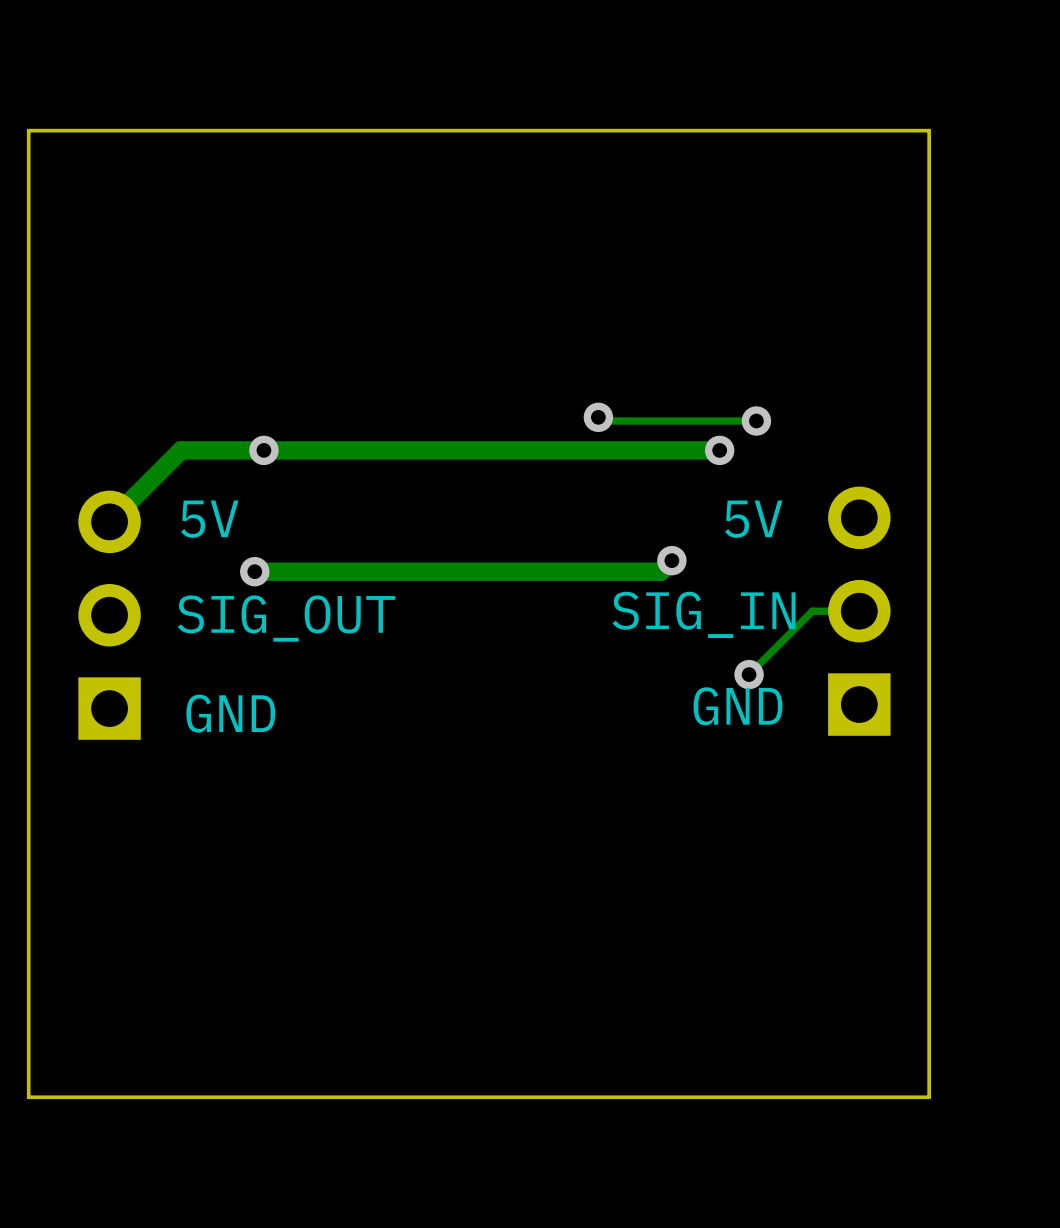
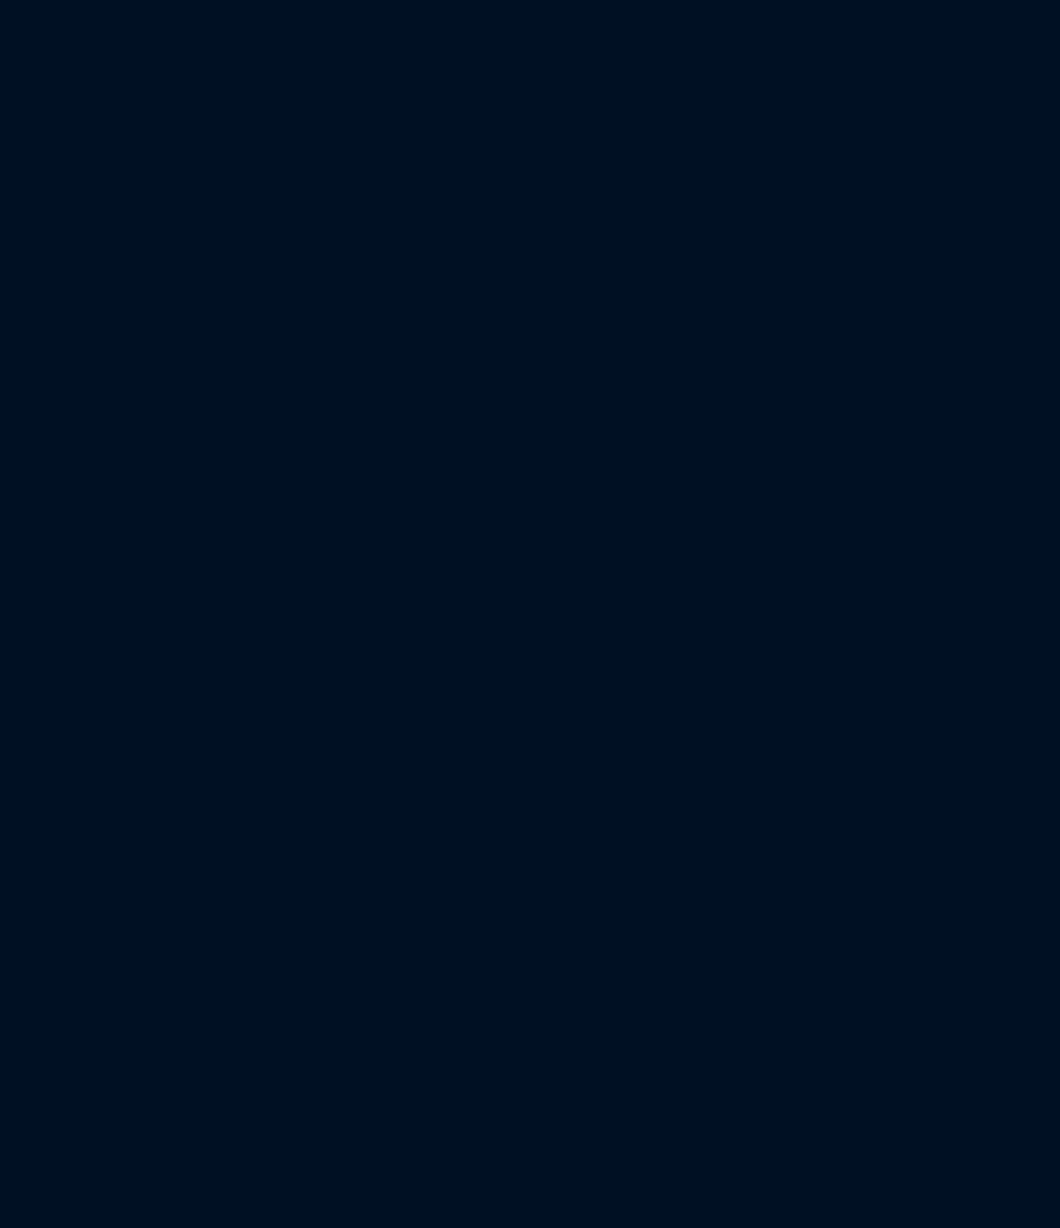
board edge: (929, 130) (929, 1097) (28, 1097) (28, 130) (929, 130) -> none
track: (598, 417) (602, 421) (756, 421) -> none
via: (598, 417) -> none
via: (756, 421) -> none
via: (263, 450) -> none
track: (719, 450) (181, 450) (109, 521) -> none
via: (719, 450) -> none
text: 5V (209, 519) -> none
text: 5V (753, 519) -> none
track: (671, 560) (660, 571) (254, 571) -> none
via: (671, 560) -> none
via: (254, 571) -> none
track: (859, 611) (812, 611) (749, 674) -> none
part: (859, 611) -> none
text: SIG_IN (704, 614) -> none
part: (109, 615) -> none
text: SIG_OUT (286, 618) -> none
via: (749, 674) -> none
text: GND (738, 706) -> none
text: GND (230, 713) -> none

